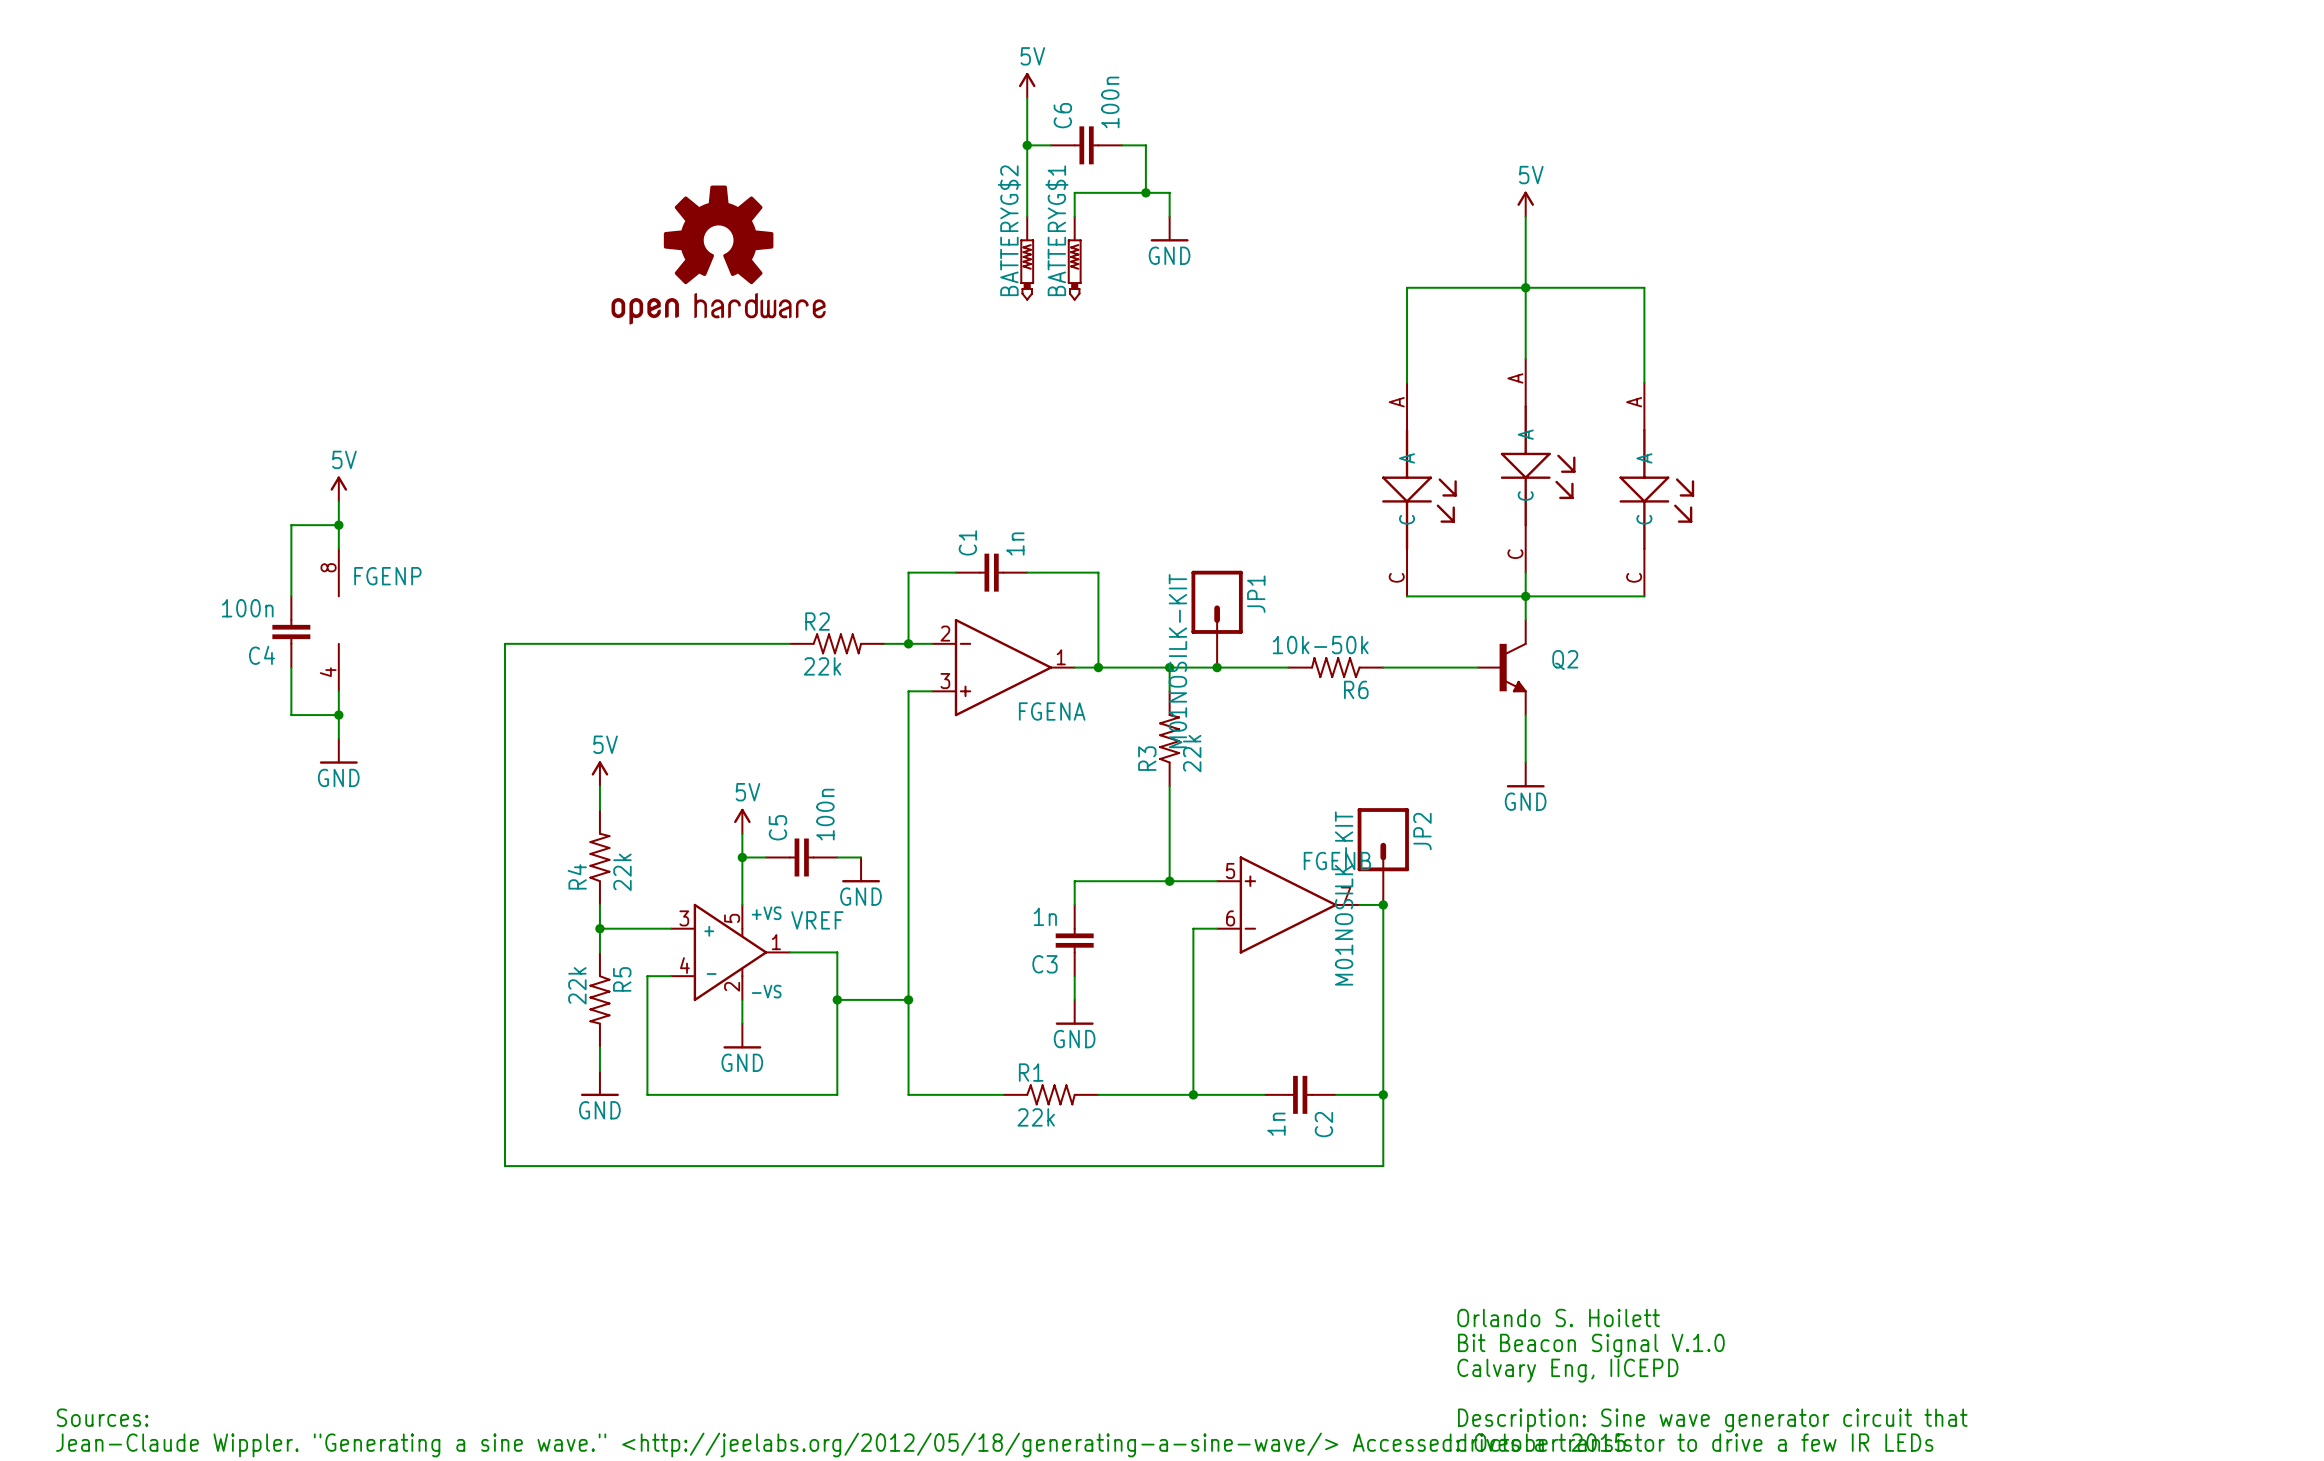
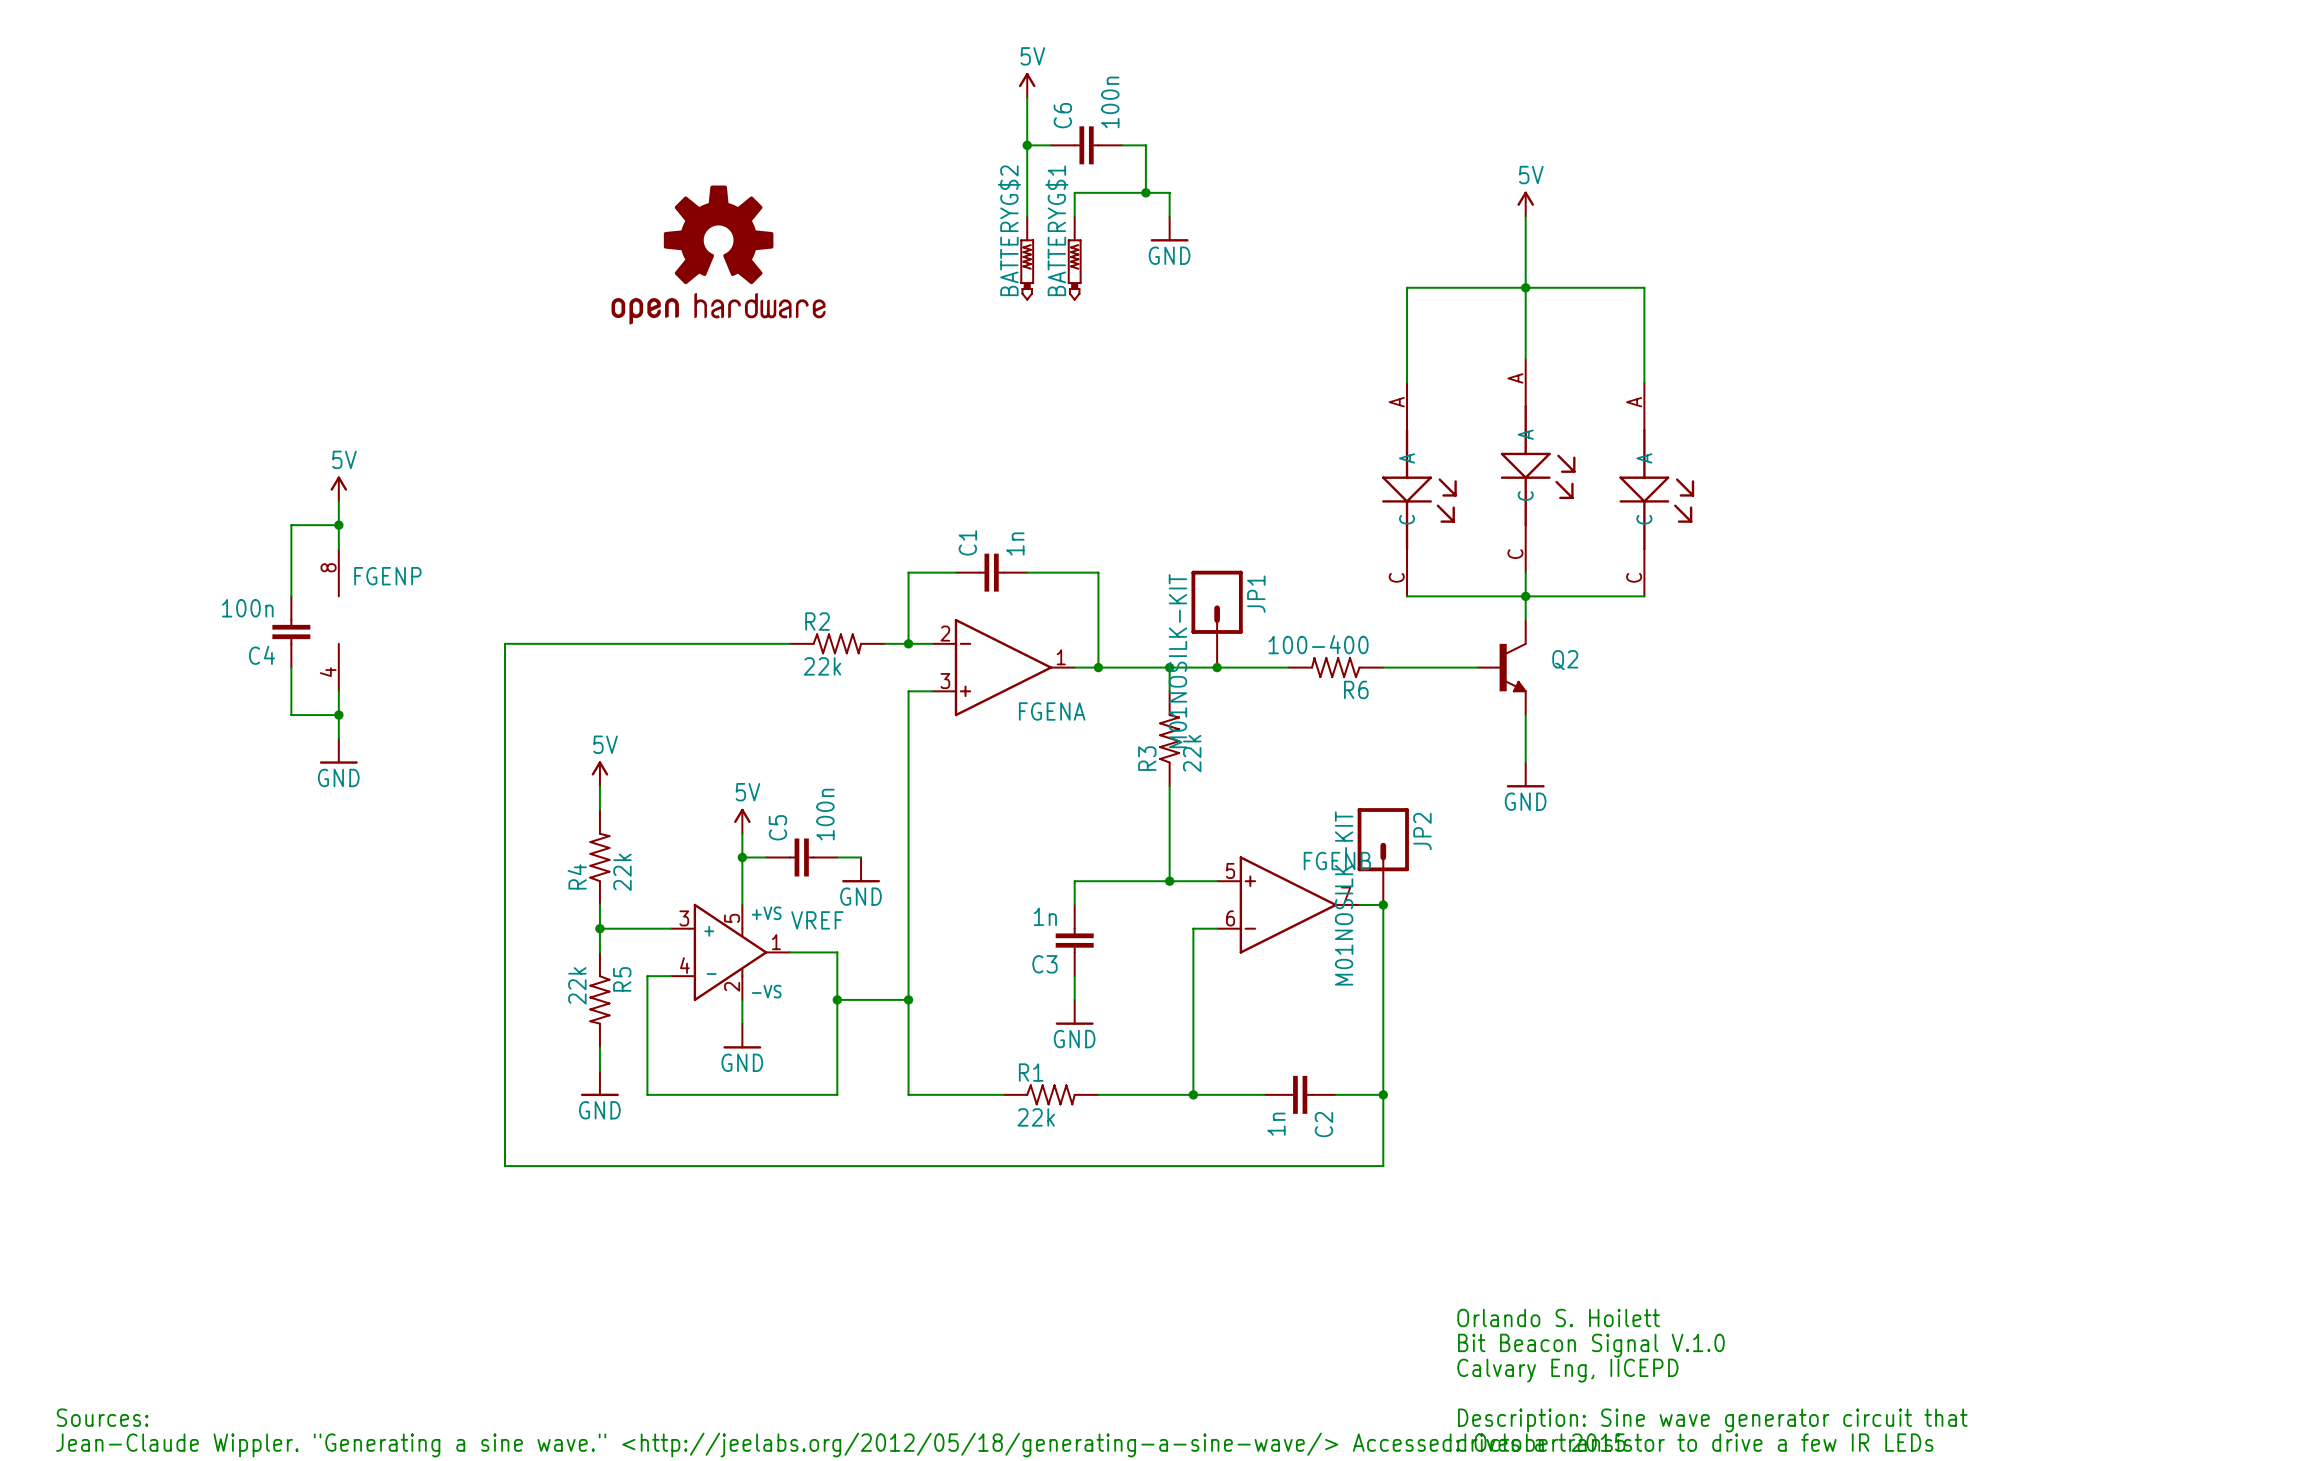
R6 value: 10k-50k (1320, 645) -> 100-400 (1318, 644)

